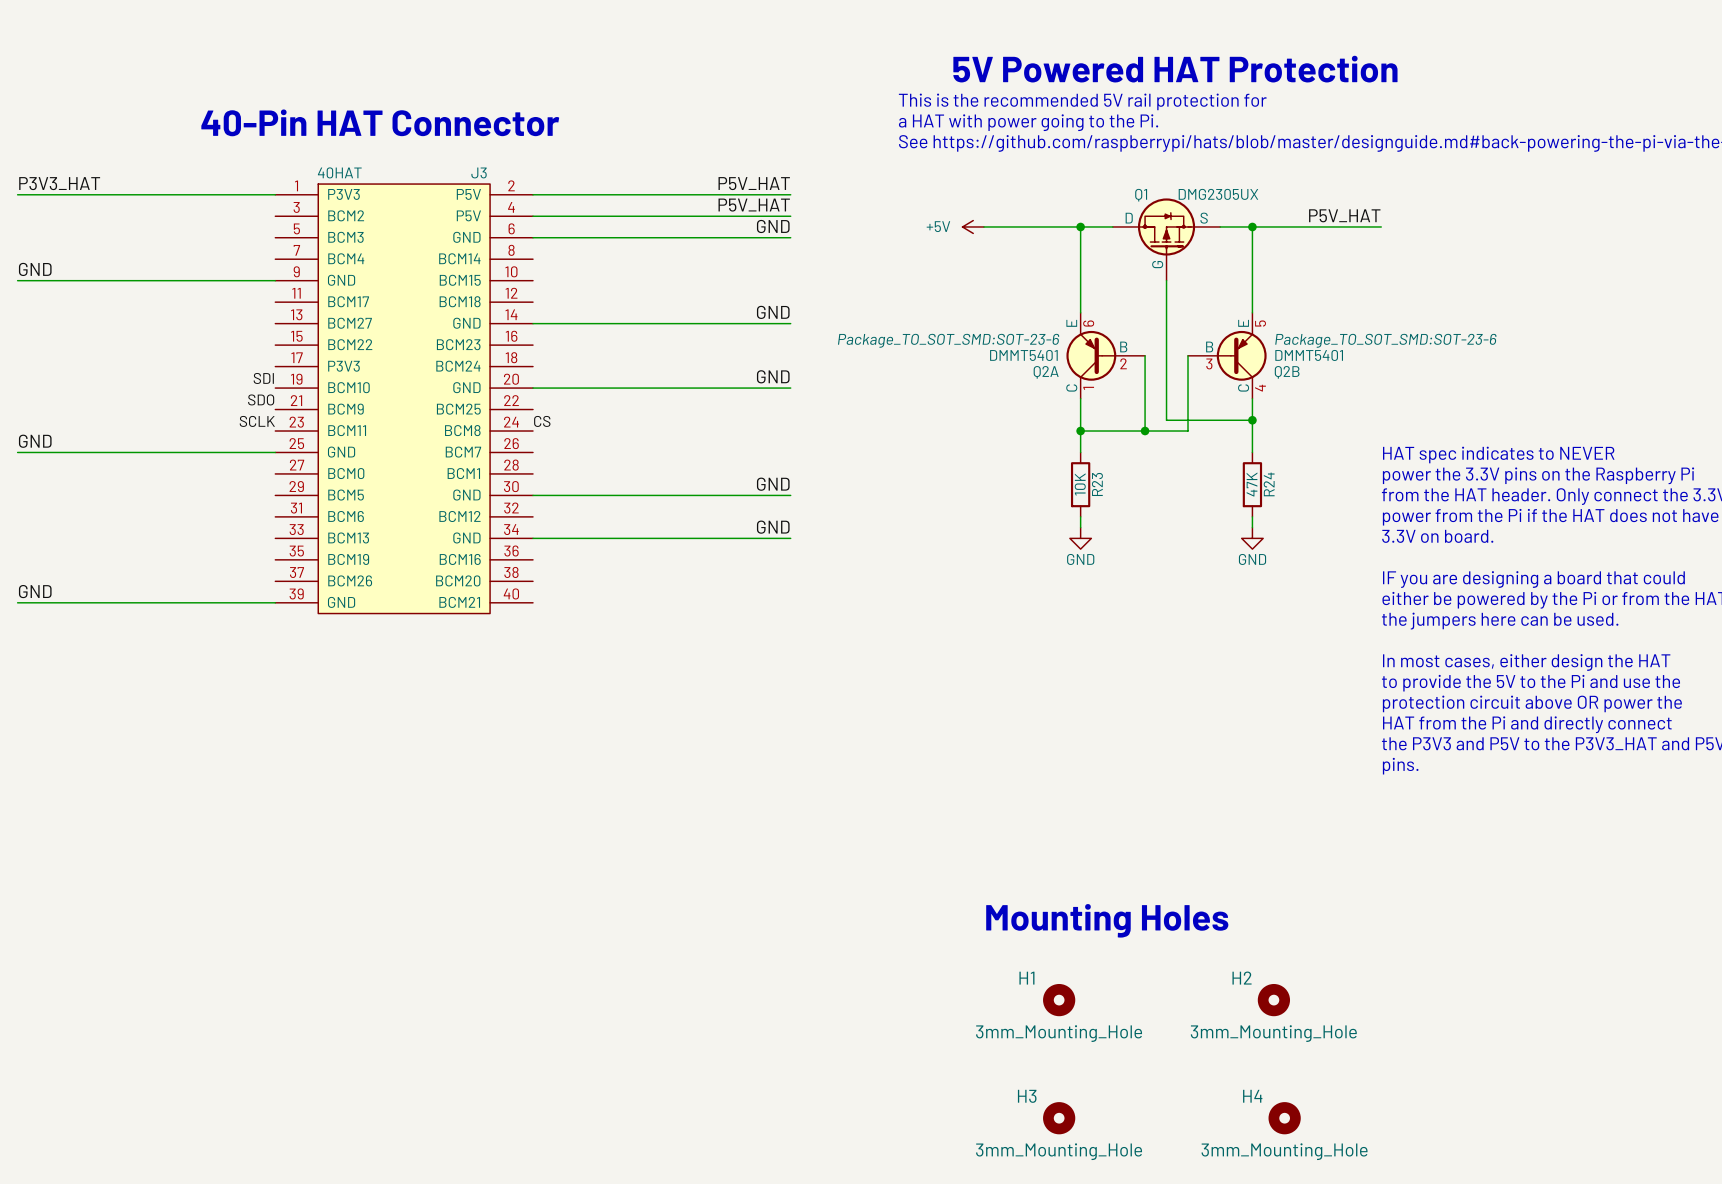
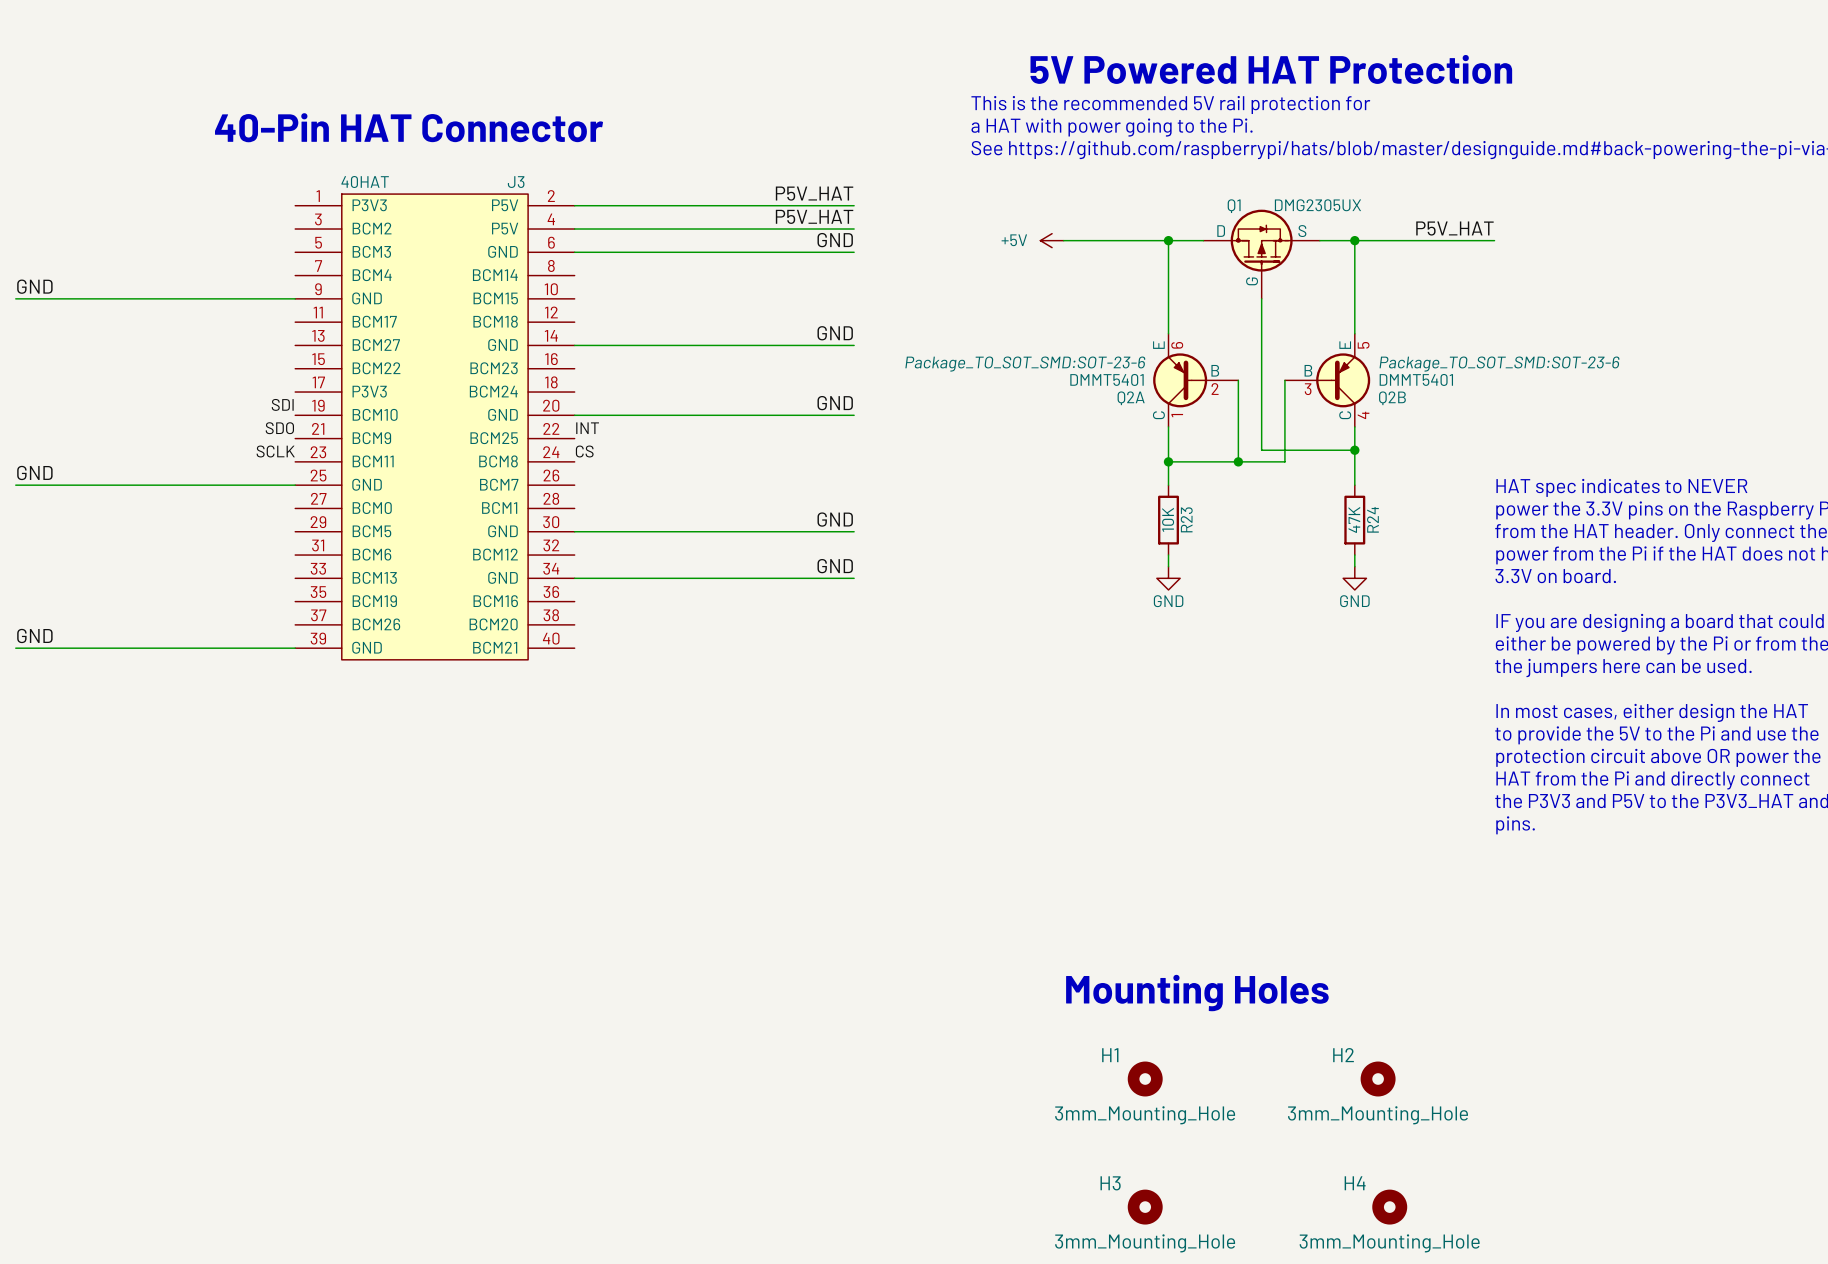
label: P3V3_HAT (59, 183) -> none
wire: (17, 194) (275, 194) -> none
label: none -> INT (587, 428)

